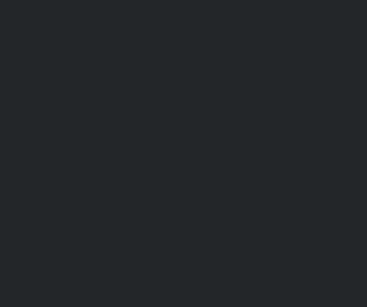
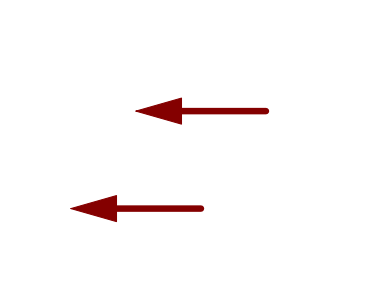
power symbol: none -> (202, 111)
power symbol: none -> (137, 208)

